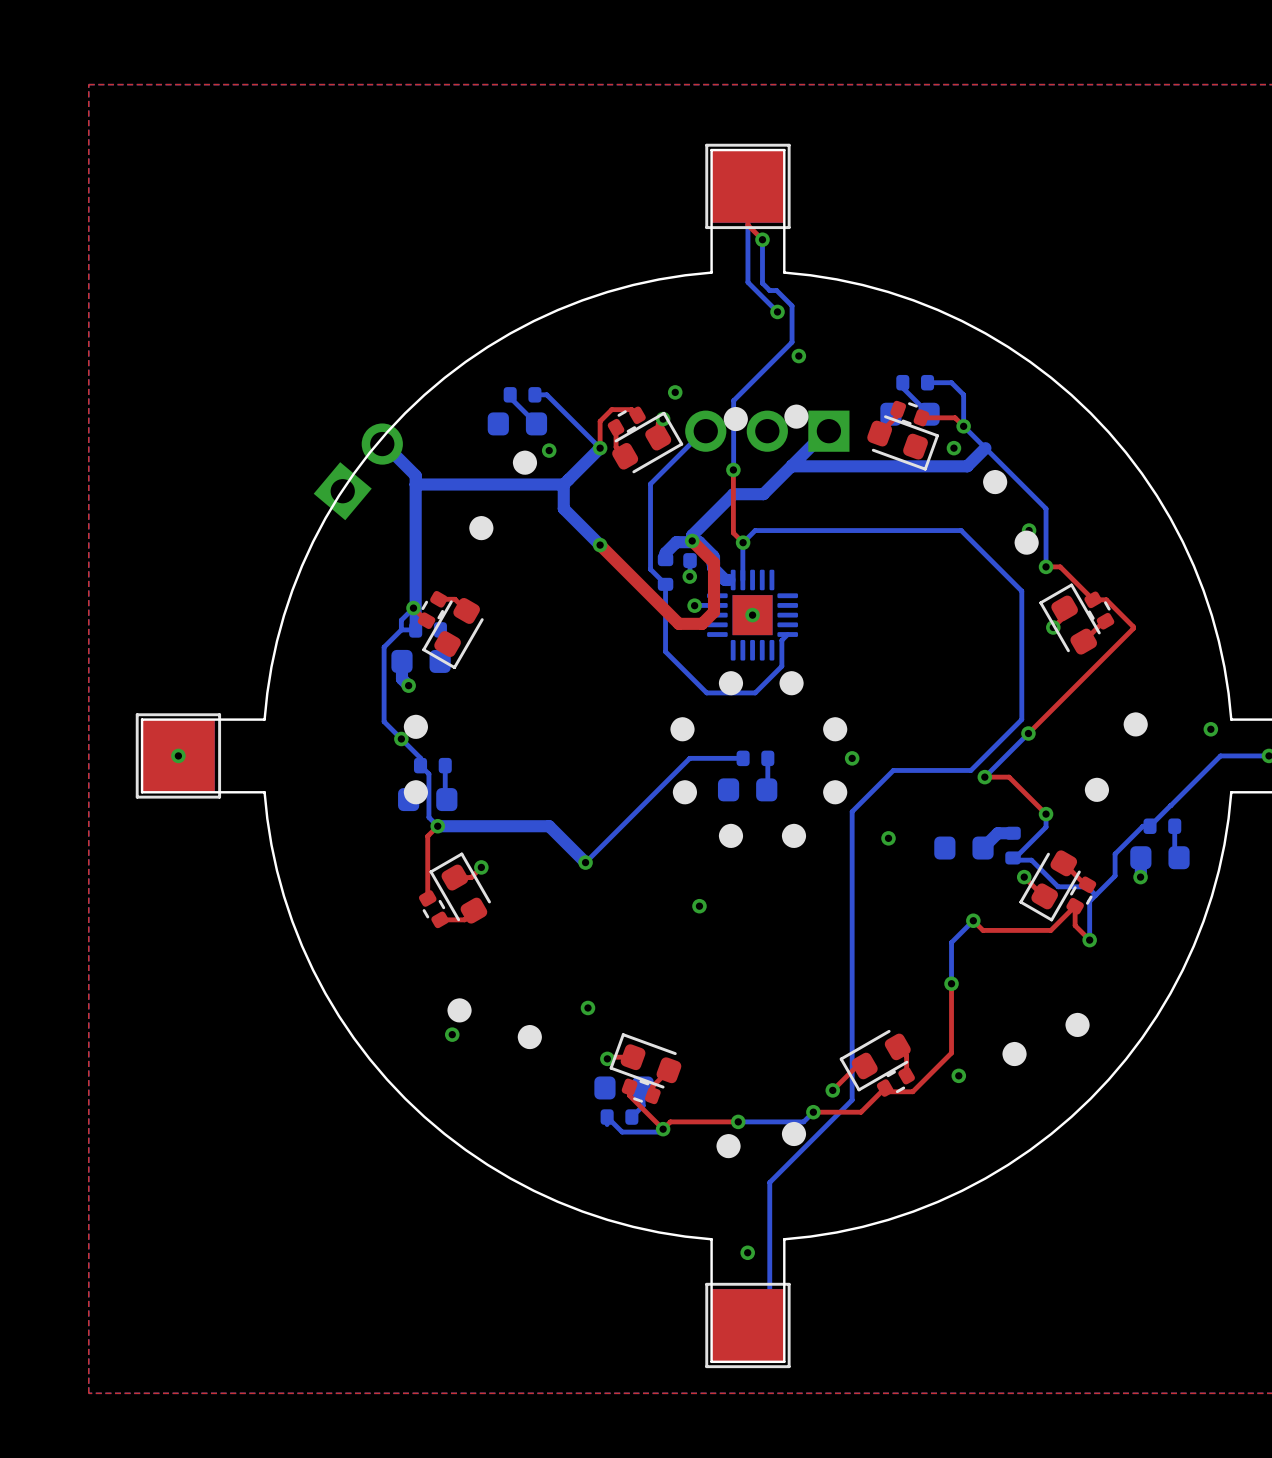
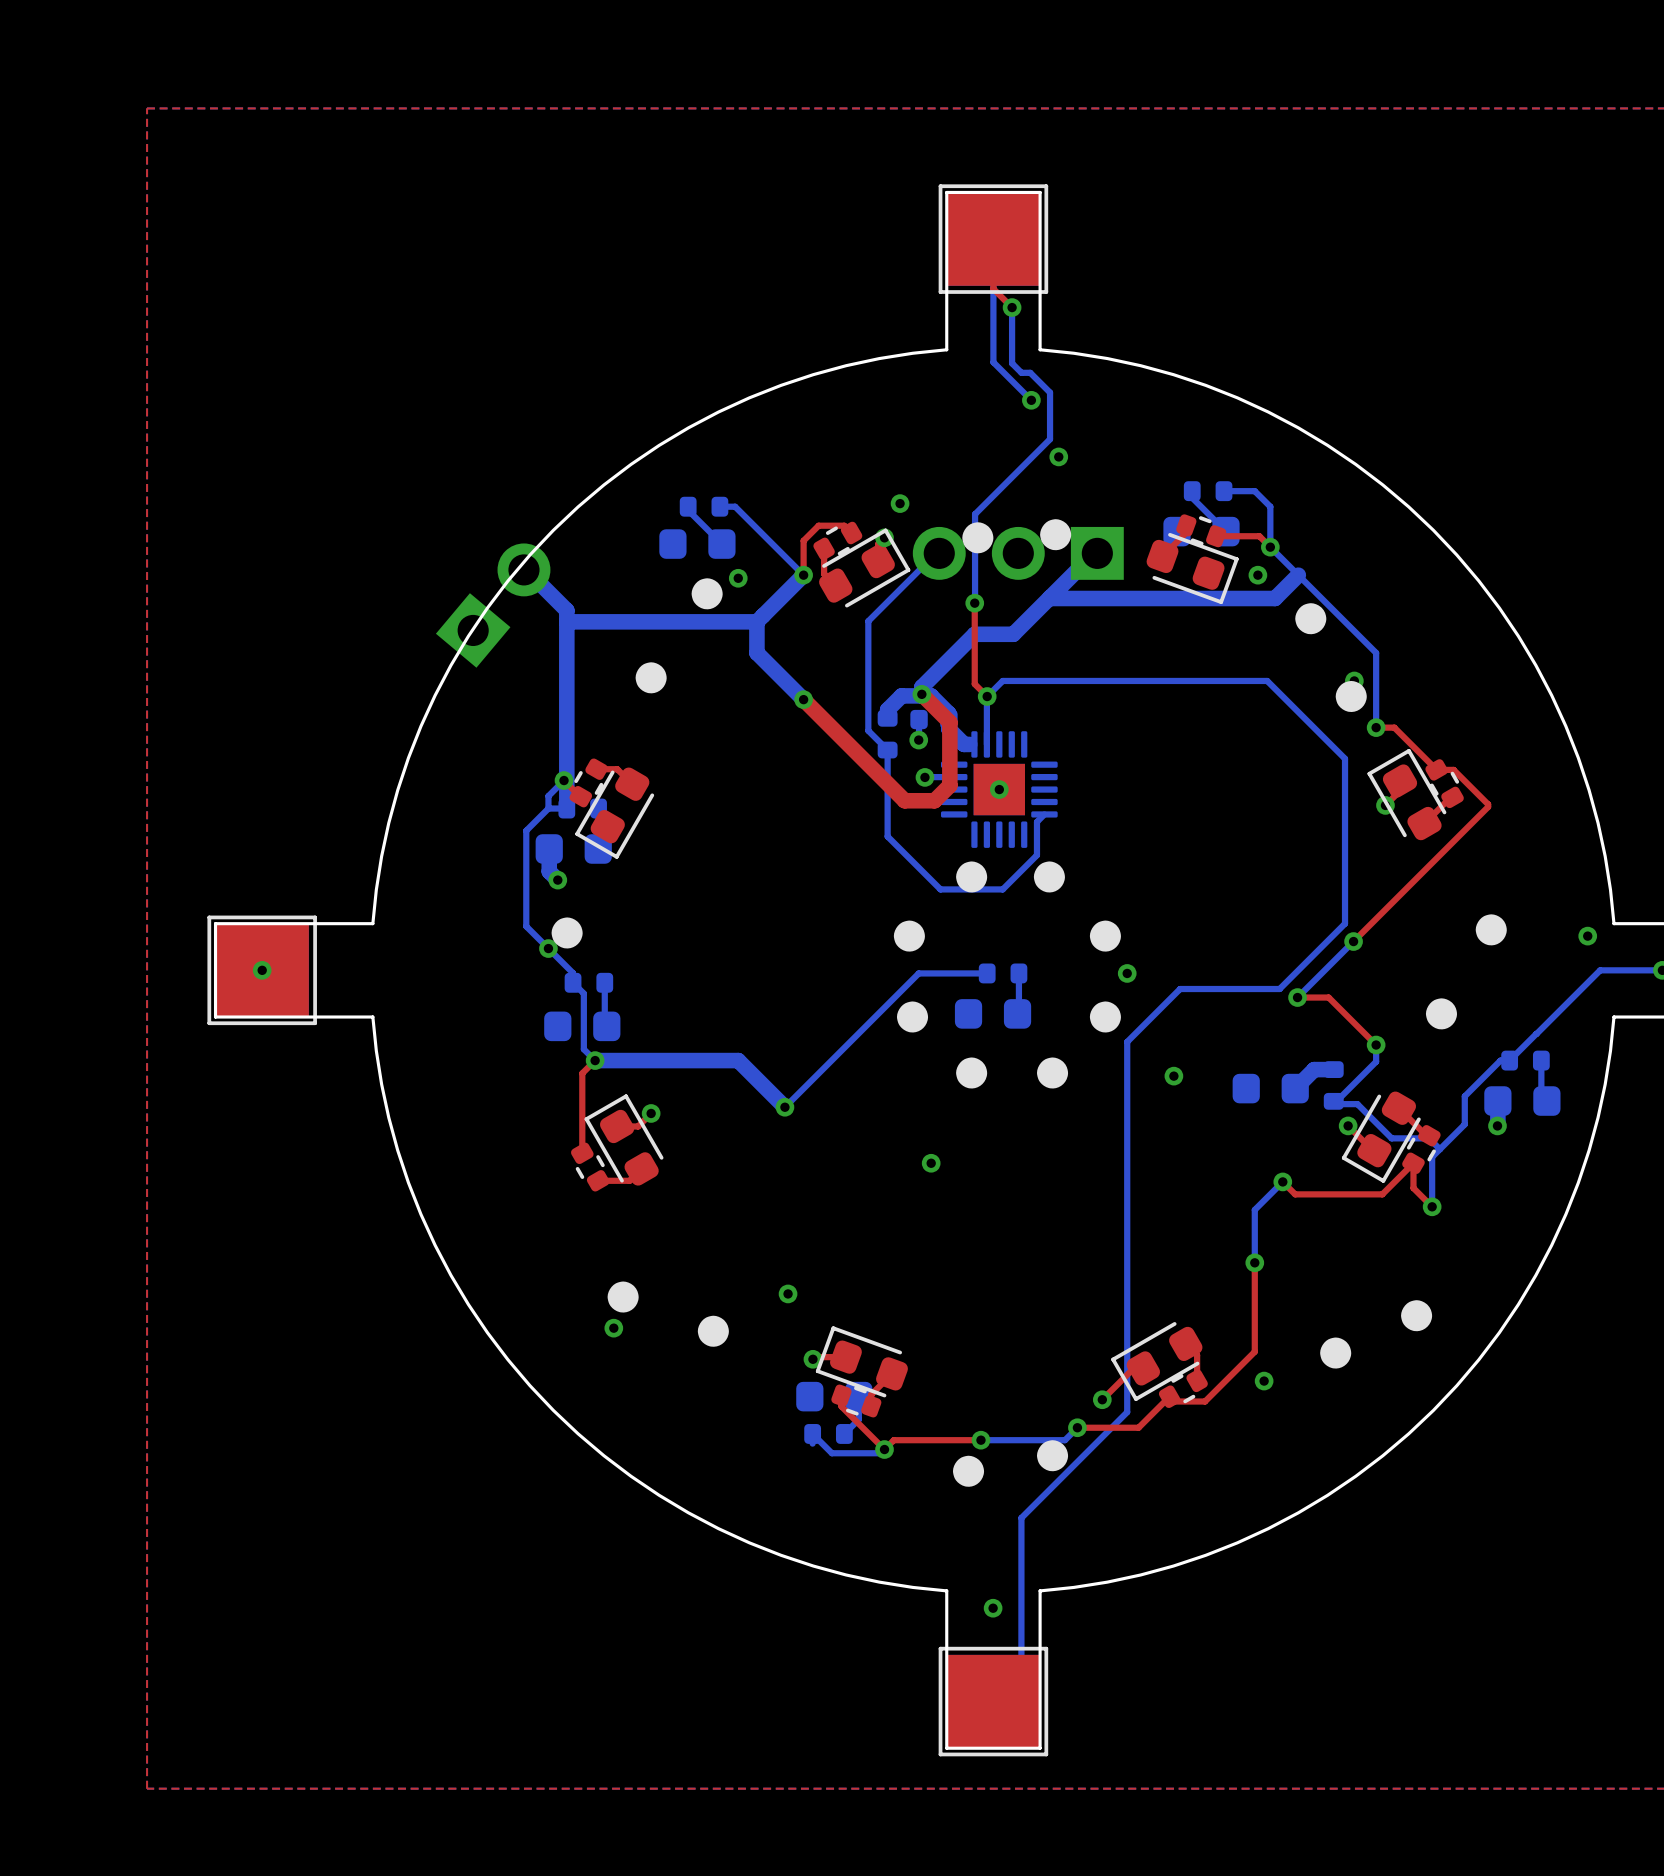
drawing: [403, 780, 429, 805] -> none

